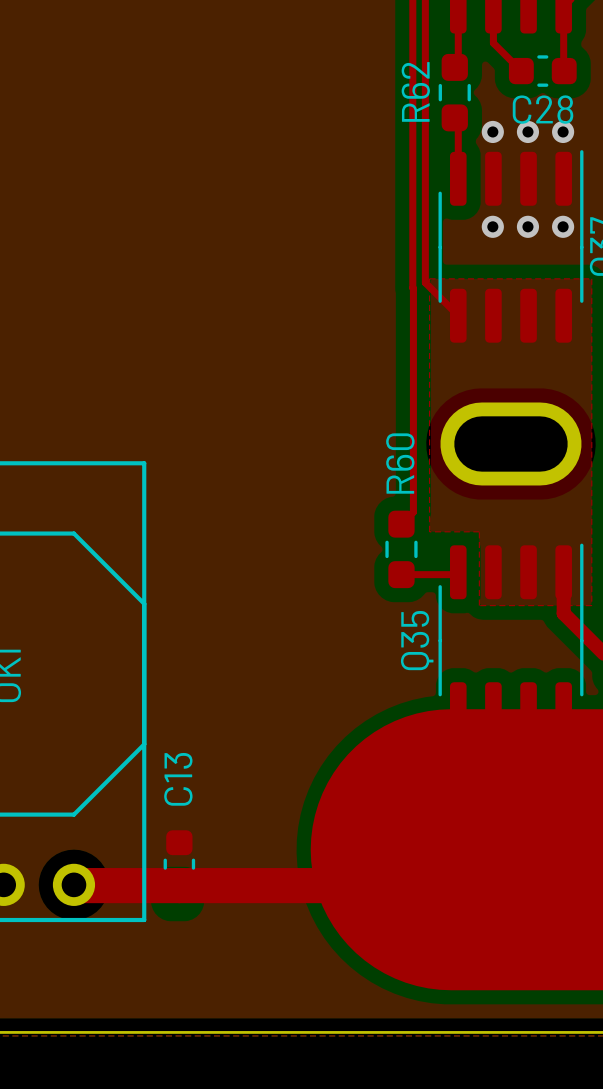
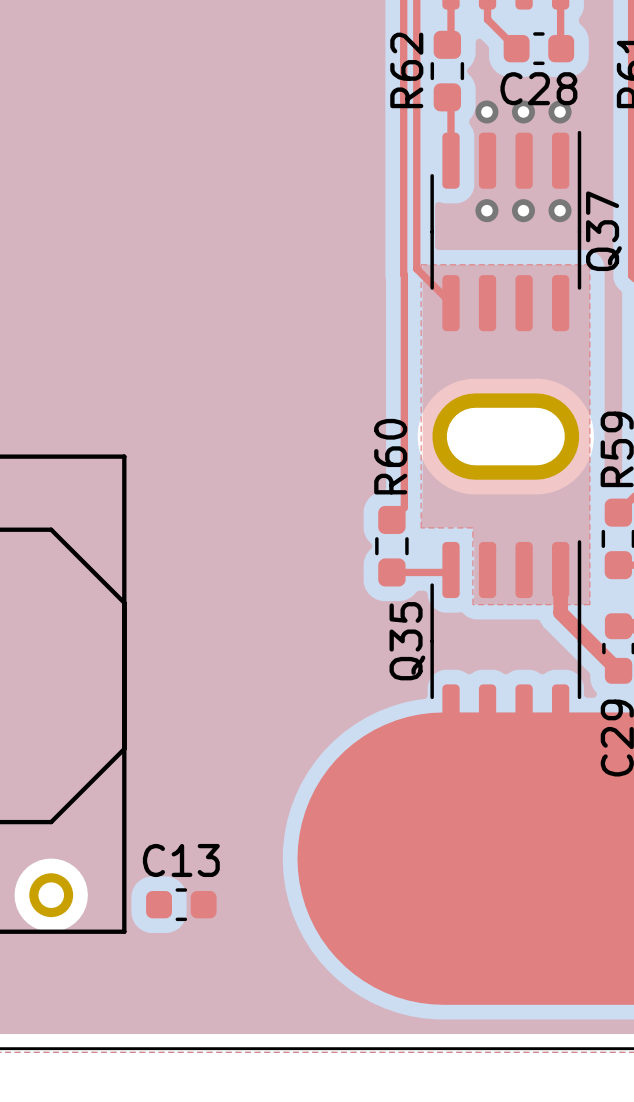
top track: (451, 849) (415, 885) (73, 884) -> none
C13 rotation: 0° (179, 864) -> 90° clockwise (181, 904)

